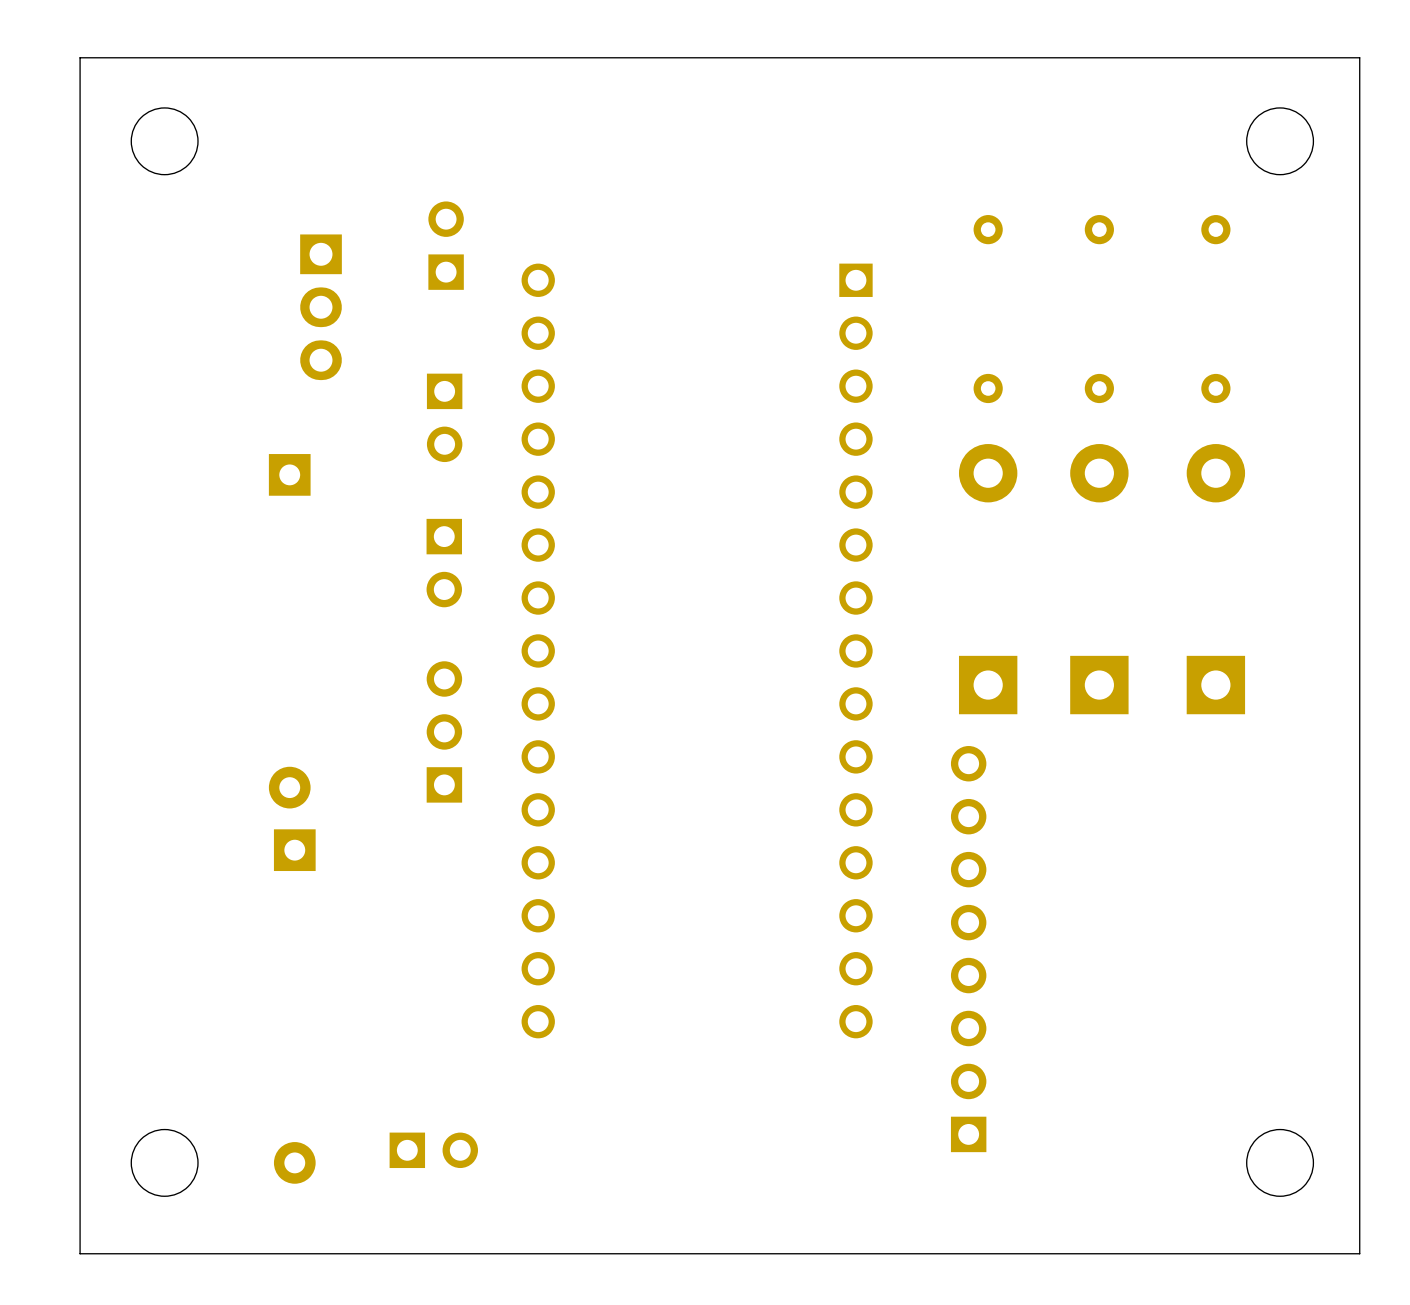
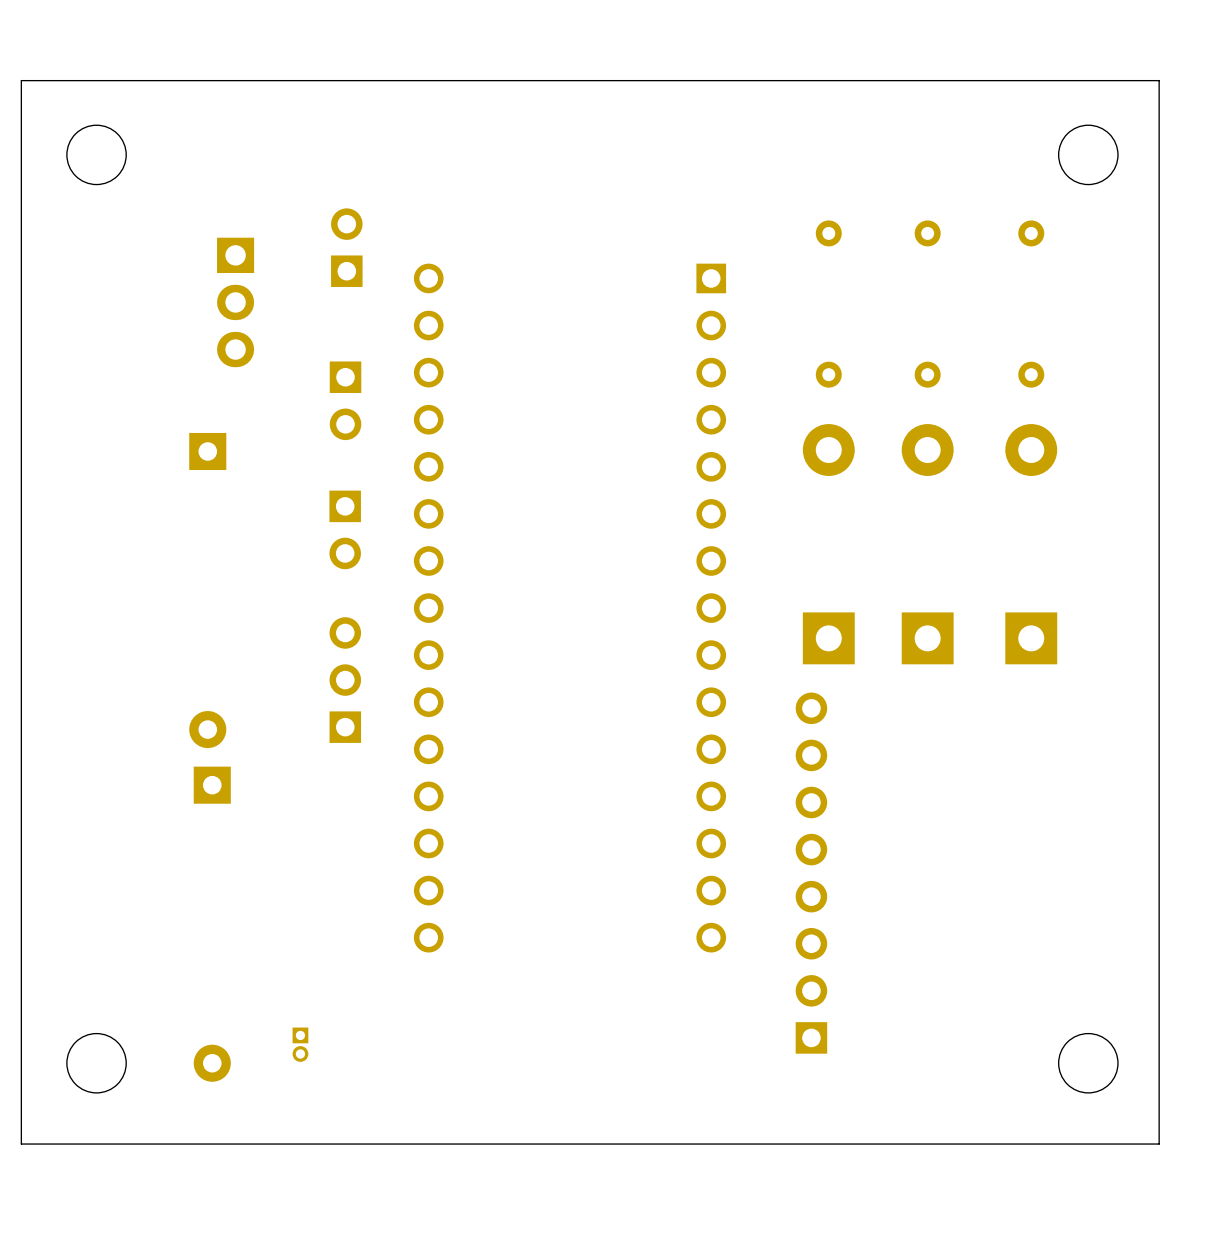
part: none -> (300, 1044)
part: (433, 1150) -> none

